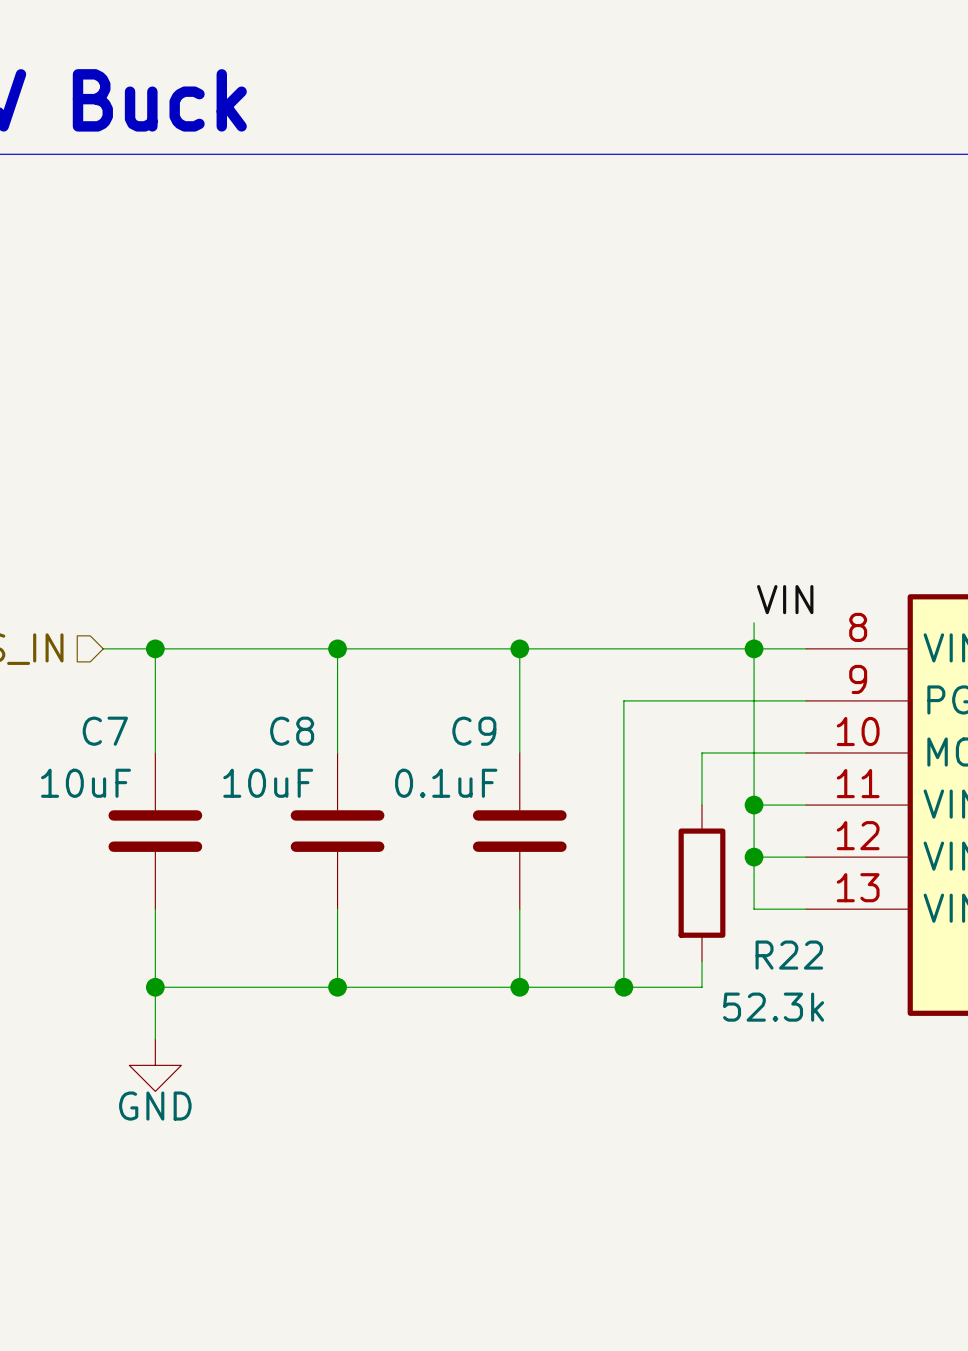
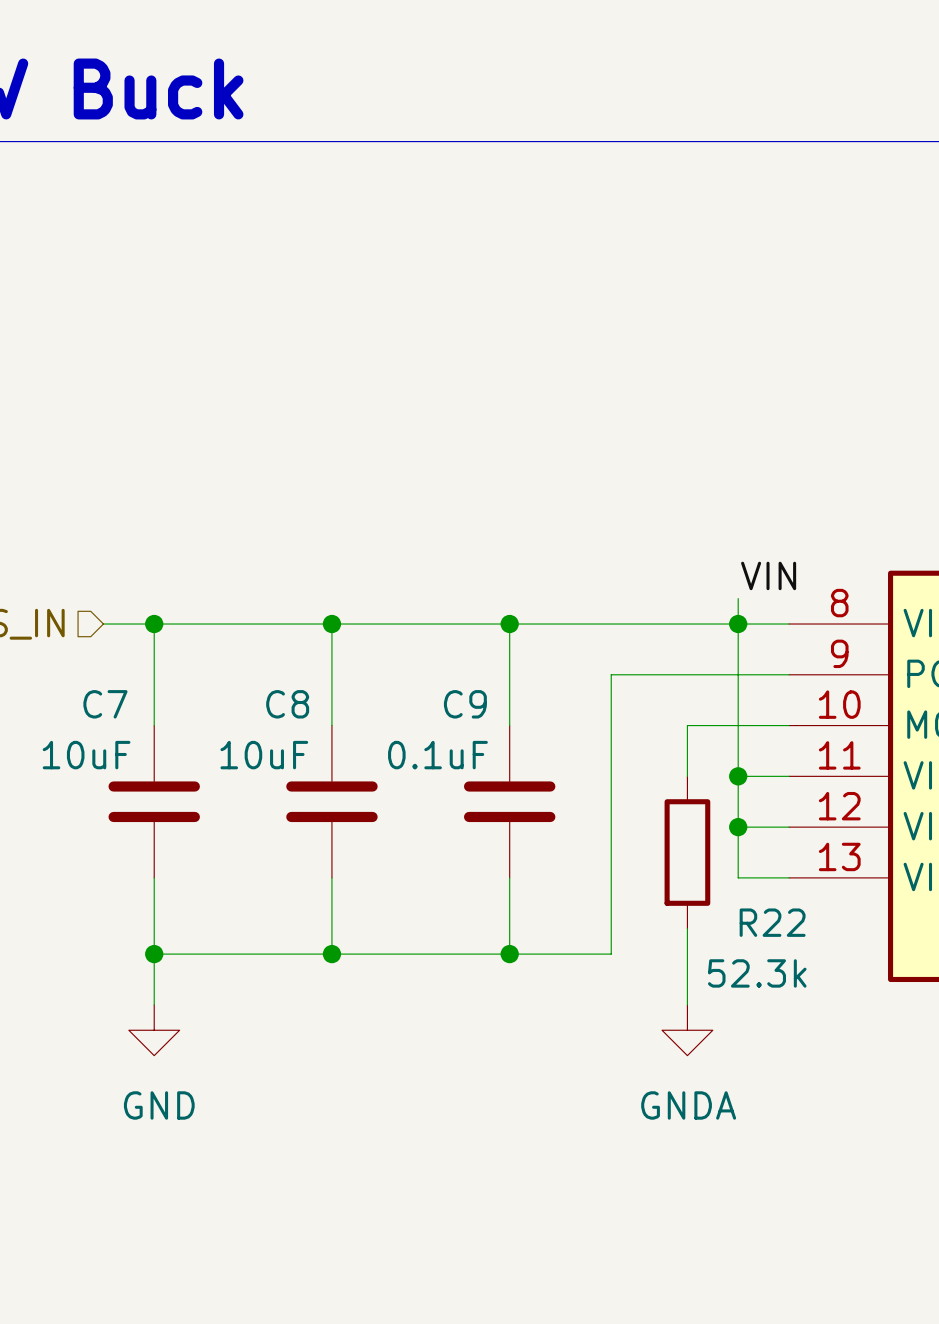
wire: (623, 987) (701, 987) -> (687, 1004) (687, 954)
junction: (623, 987) -> none
power symbol: none -> GNDA (687, 1030)
power symbol text position: GND (155, 1106) -> GND (159, 1105)

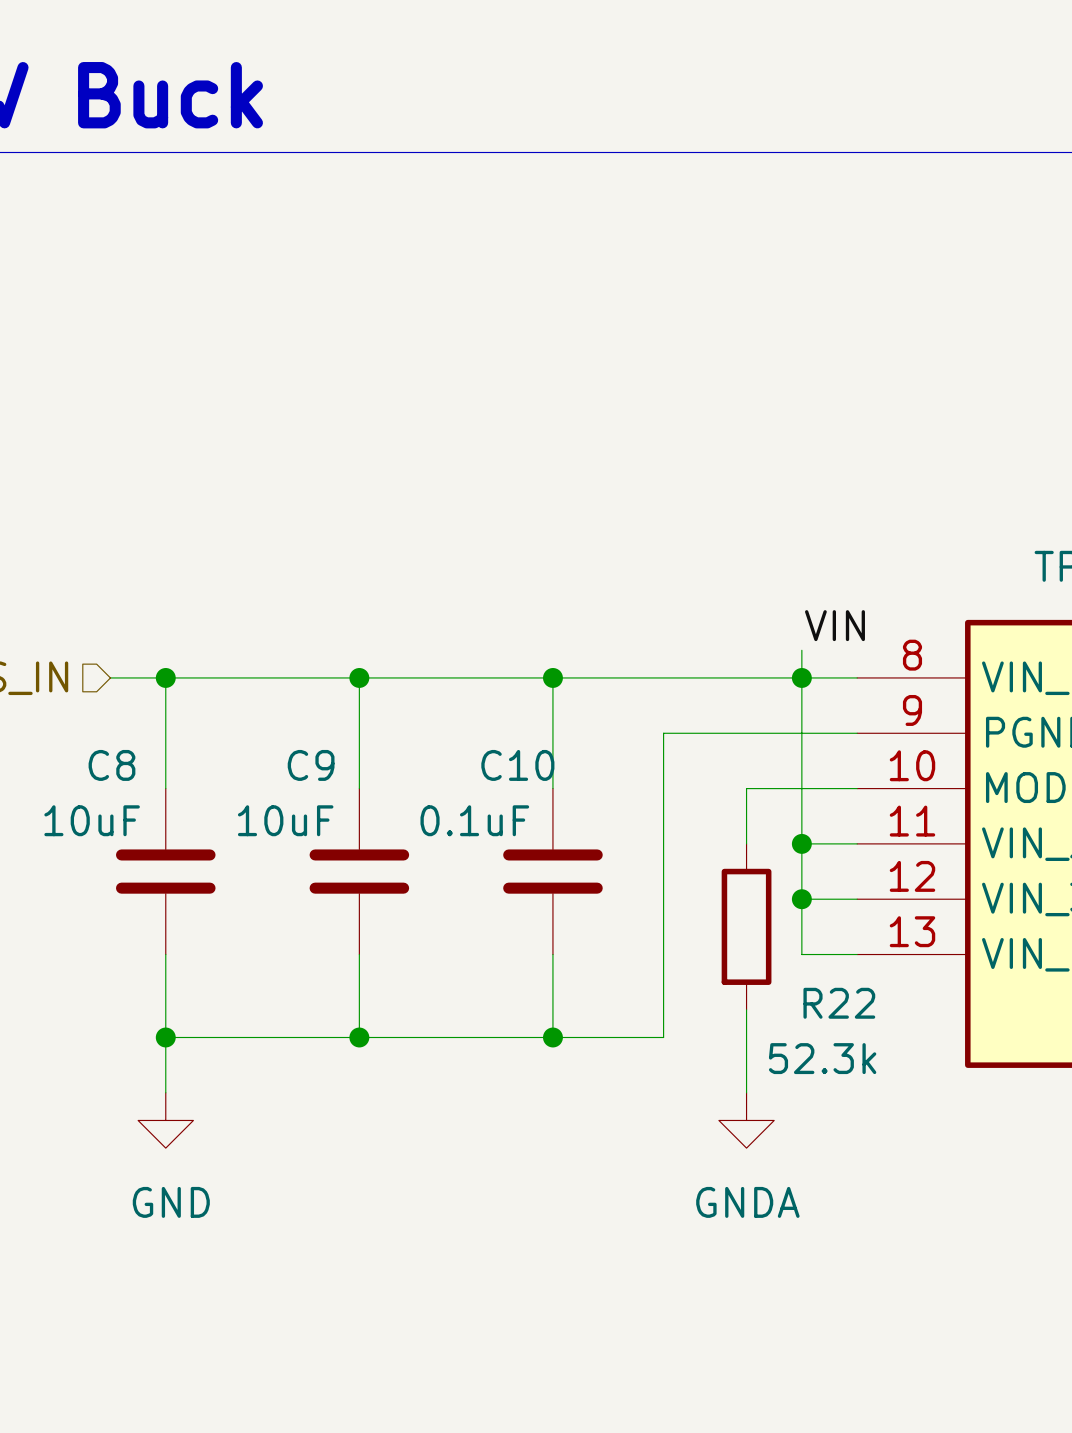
C7 name: C7 (105, 704) -> C8 (111, 765)
C8 name: C8 (287, 704) -> C9 (311, 765)
C9 name: C9 (465, 704) -> C10 (517, 765)

